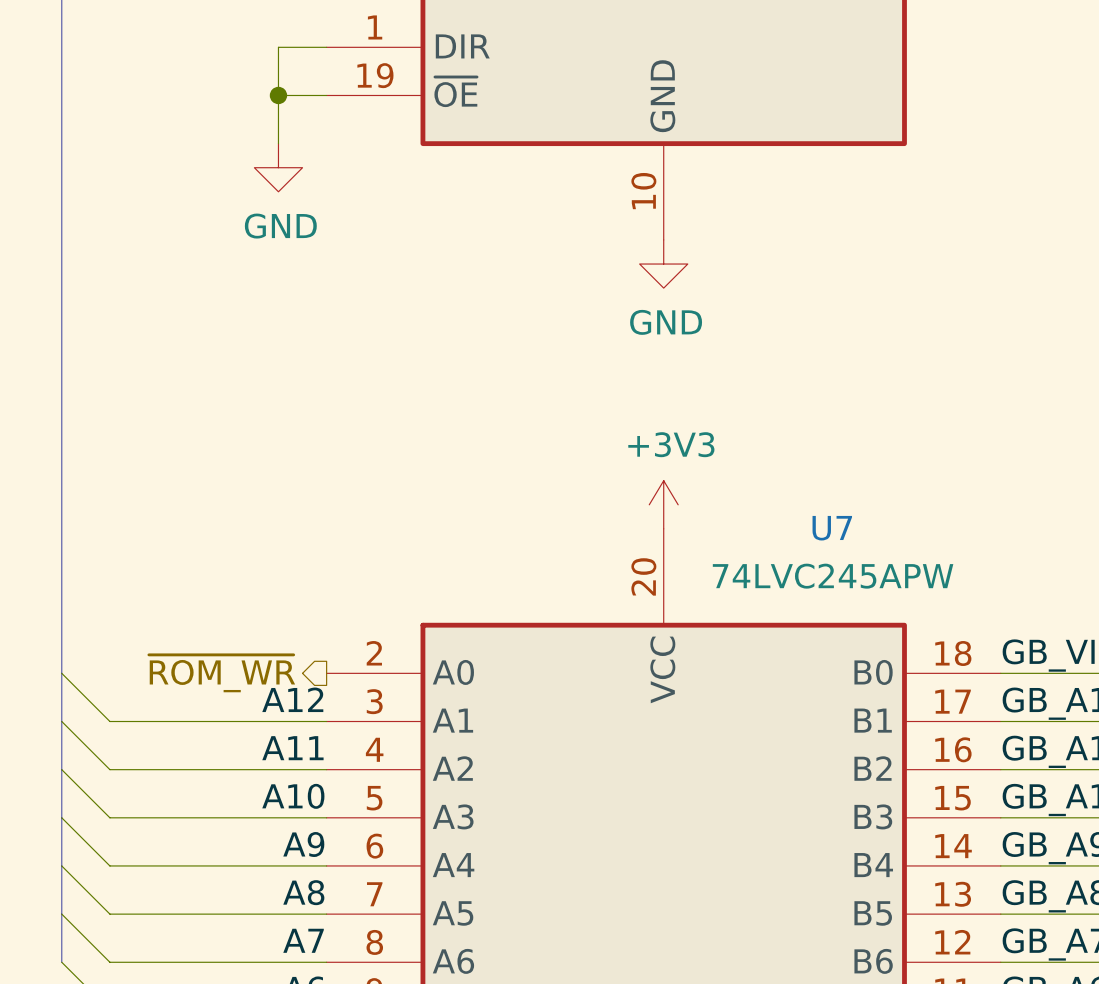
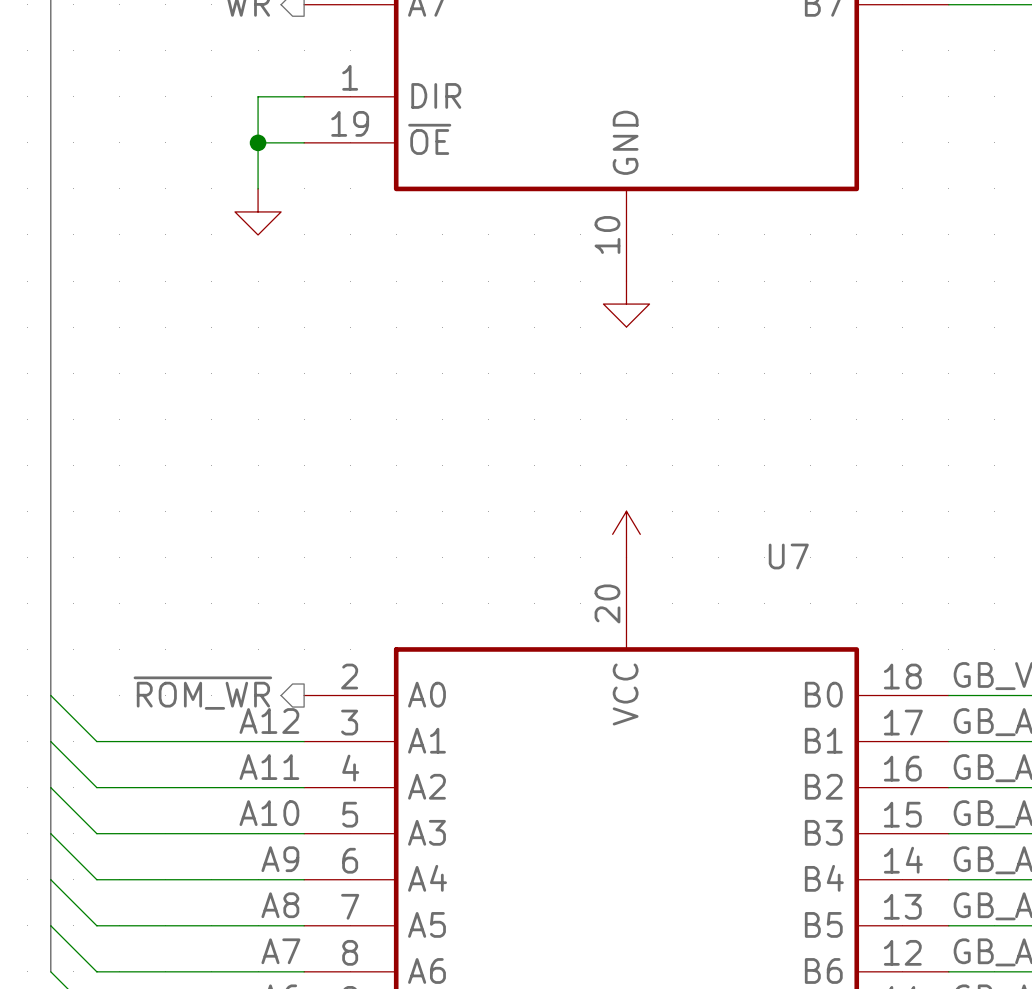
power symbol text: GND (280, 226) -> none
power symbol text: GND (666, 322) -> none
power symbol text: +3V3 (671, 444) -> none
U7 value: 74LVC245APW (833, 576) -> none

